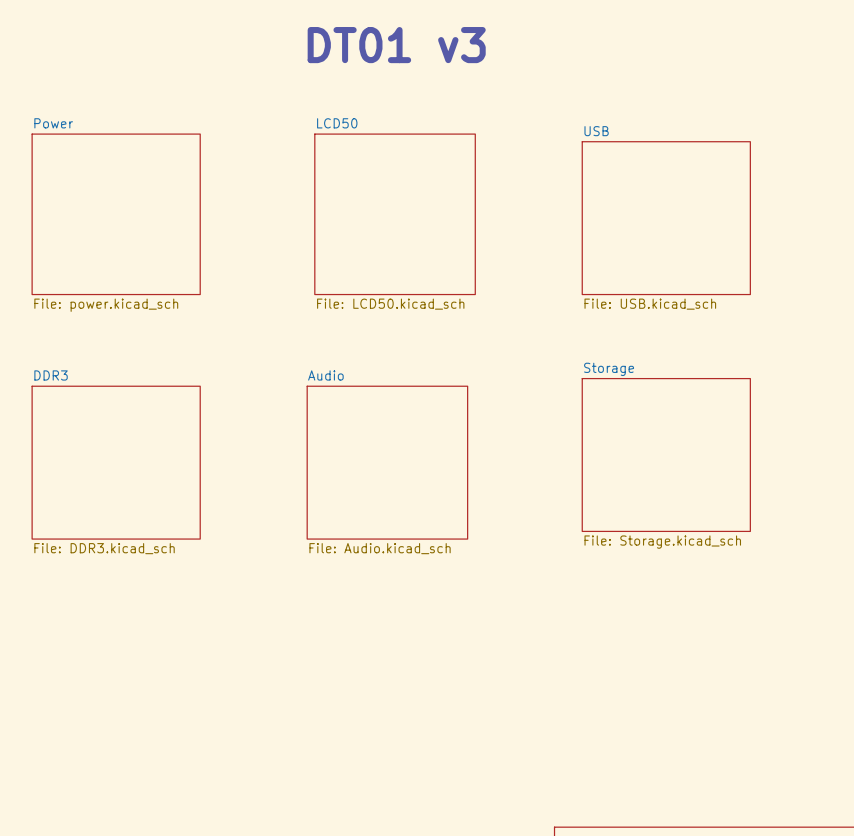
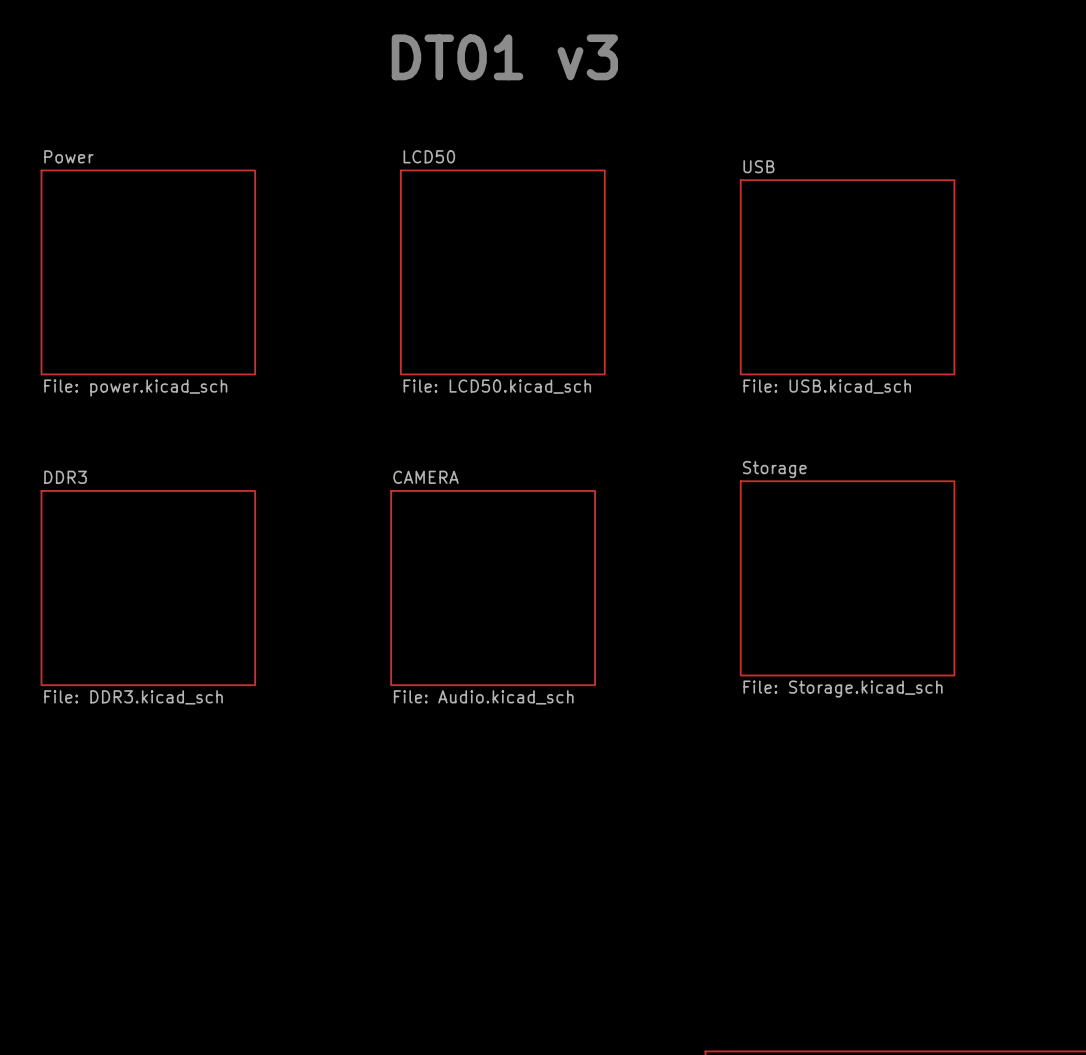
sheet Audio name: Audio (325, 375) -> CAMERA (426, 477)

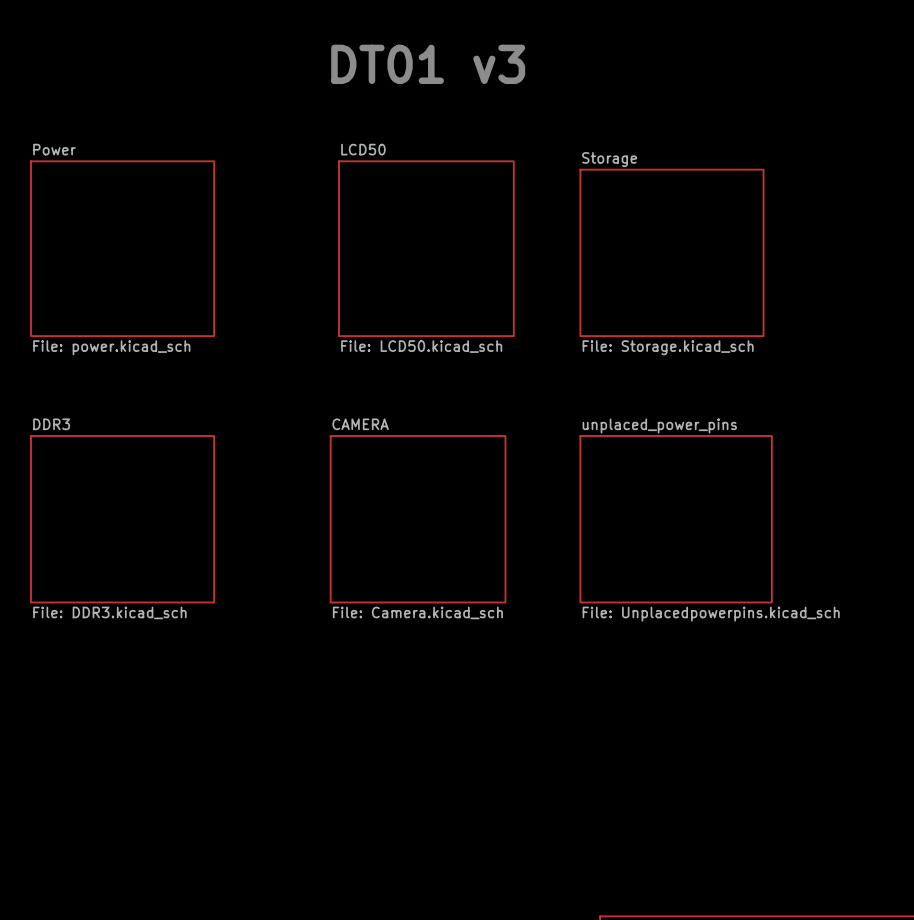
sheet Storage: none -> File: Storage.kicad_sch (671, 252)
sheet USB: File: USB.kicad_sch (847, 277) -> none
sheet Storage: File: Storage.kicad_sch (847, 578) -> none
sheet unplaced_power_pins: none -> File: Unplacedpowerpins.kicad_sch (676, 519)
sheet CAMERA value: File: Audio.kicad_sch (483, 697) -> File: Camera.kicad_sch (417, 612)

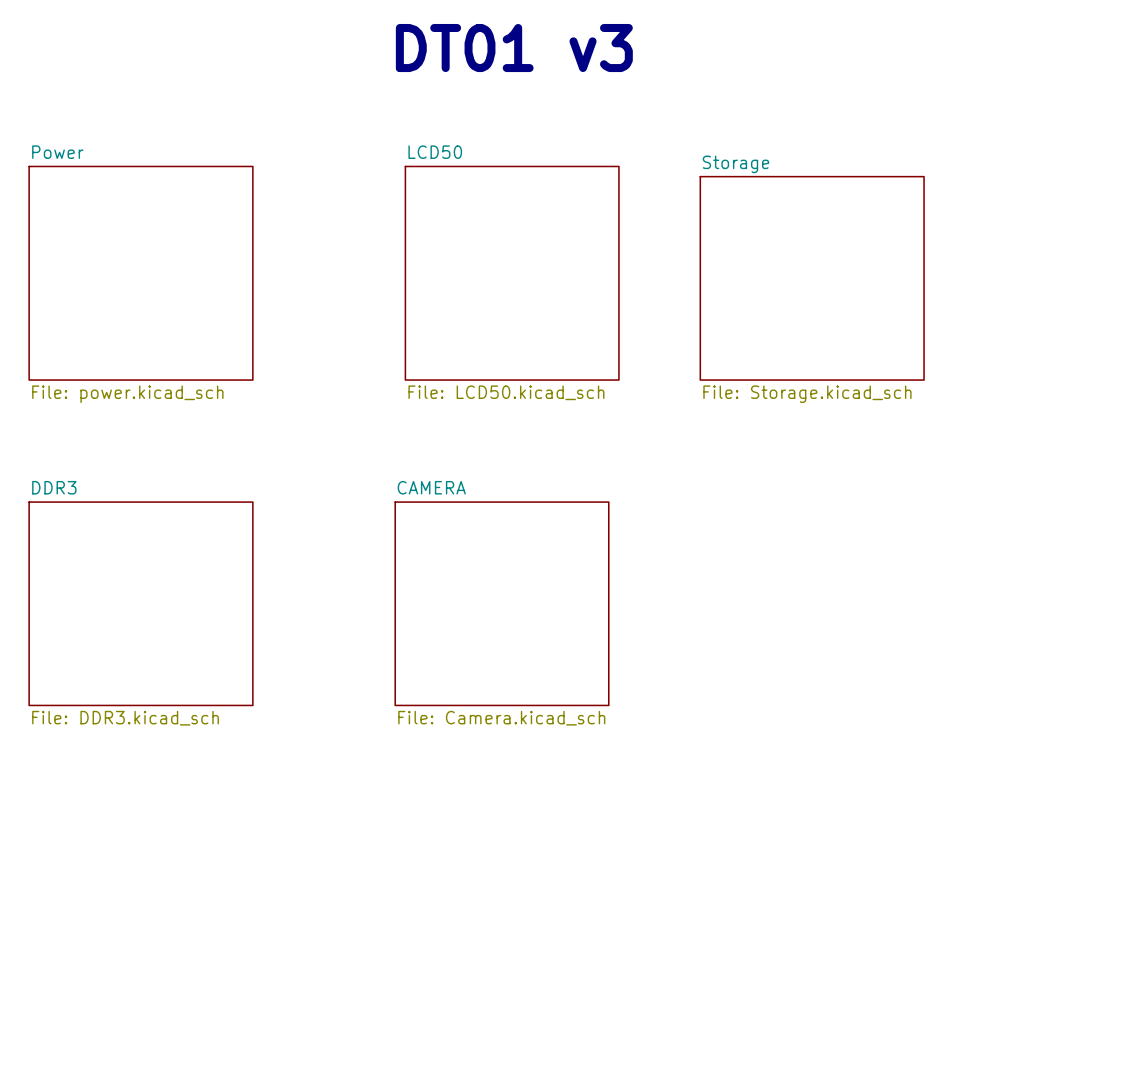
sheet unplaced_power_pins: File: Unplacedpowerpins.kicad_sch (676, 519) -> none

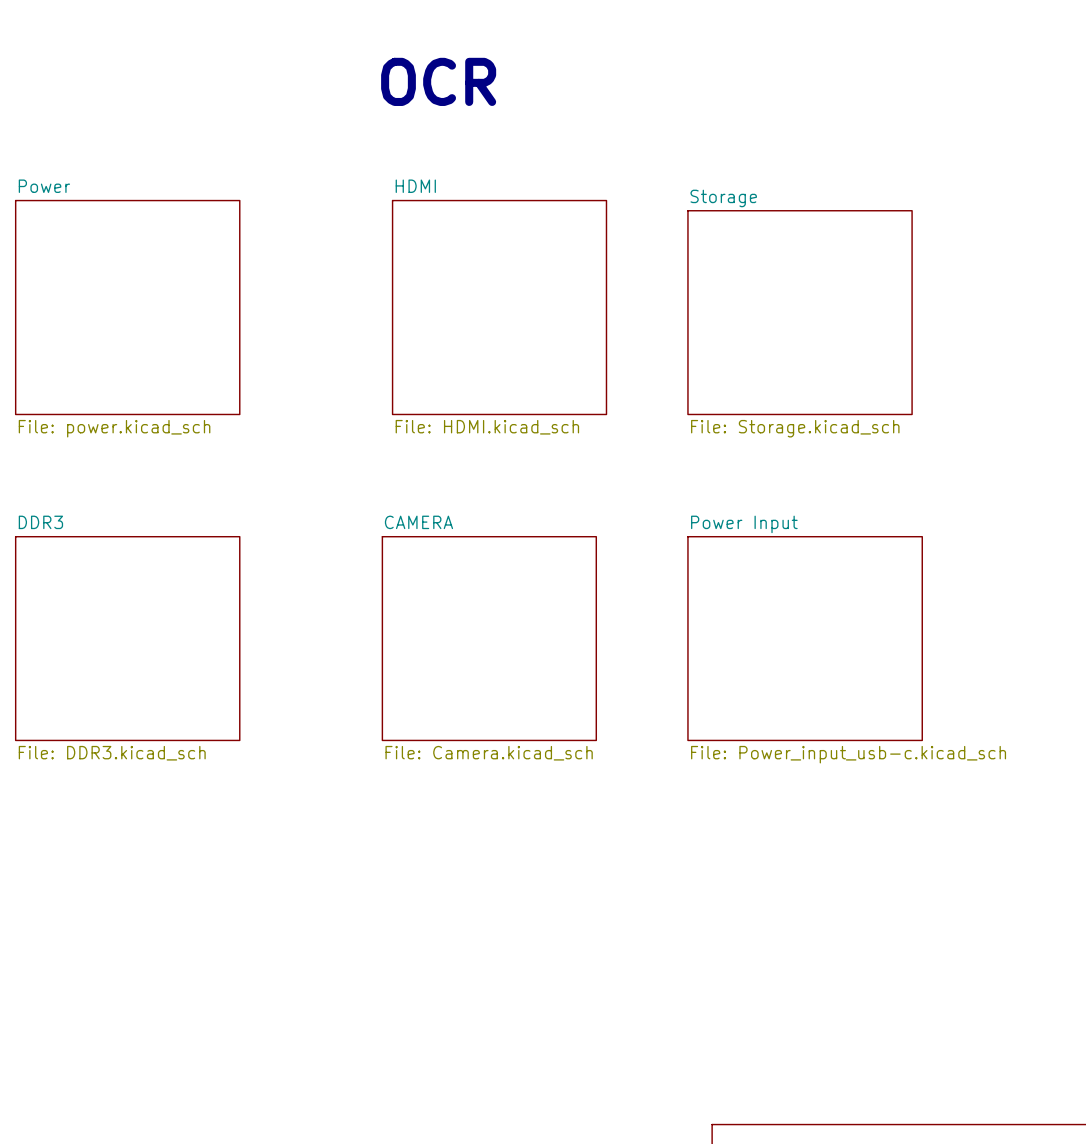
text: DT01 v3 (514, 48) -> OCR (438, 81)
sheet LCD50 name: LCD50 (435, 152) -> HDMI (415, 186)
sheet LCD50 value: File: LCD50.kicad_sch (506, 392) -> File: HDMI.kicad_sch (487, 427)
sheet Power Input: none -> File: Power_input_usb-c.kicad_sch (805, 638)

